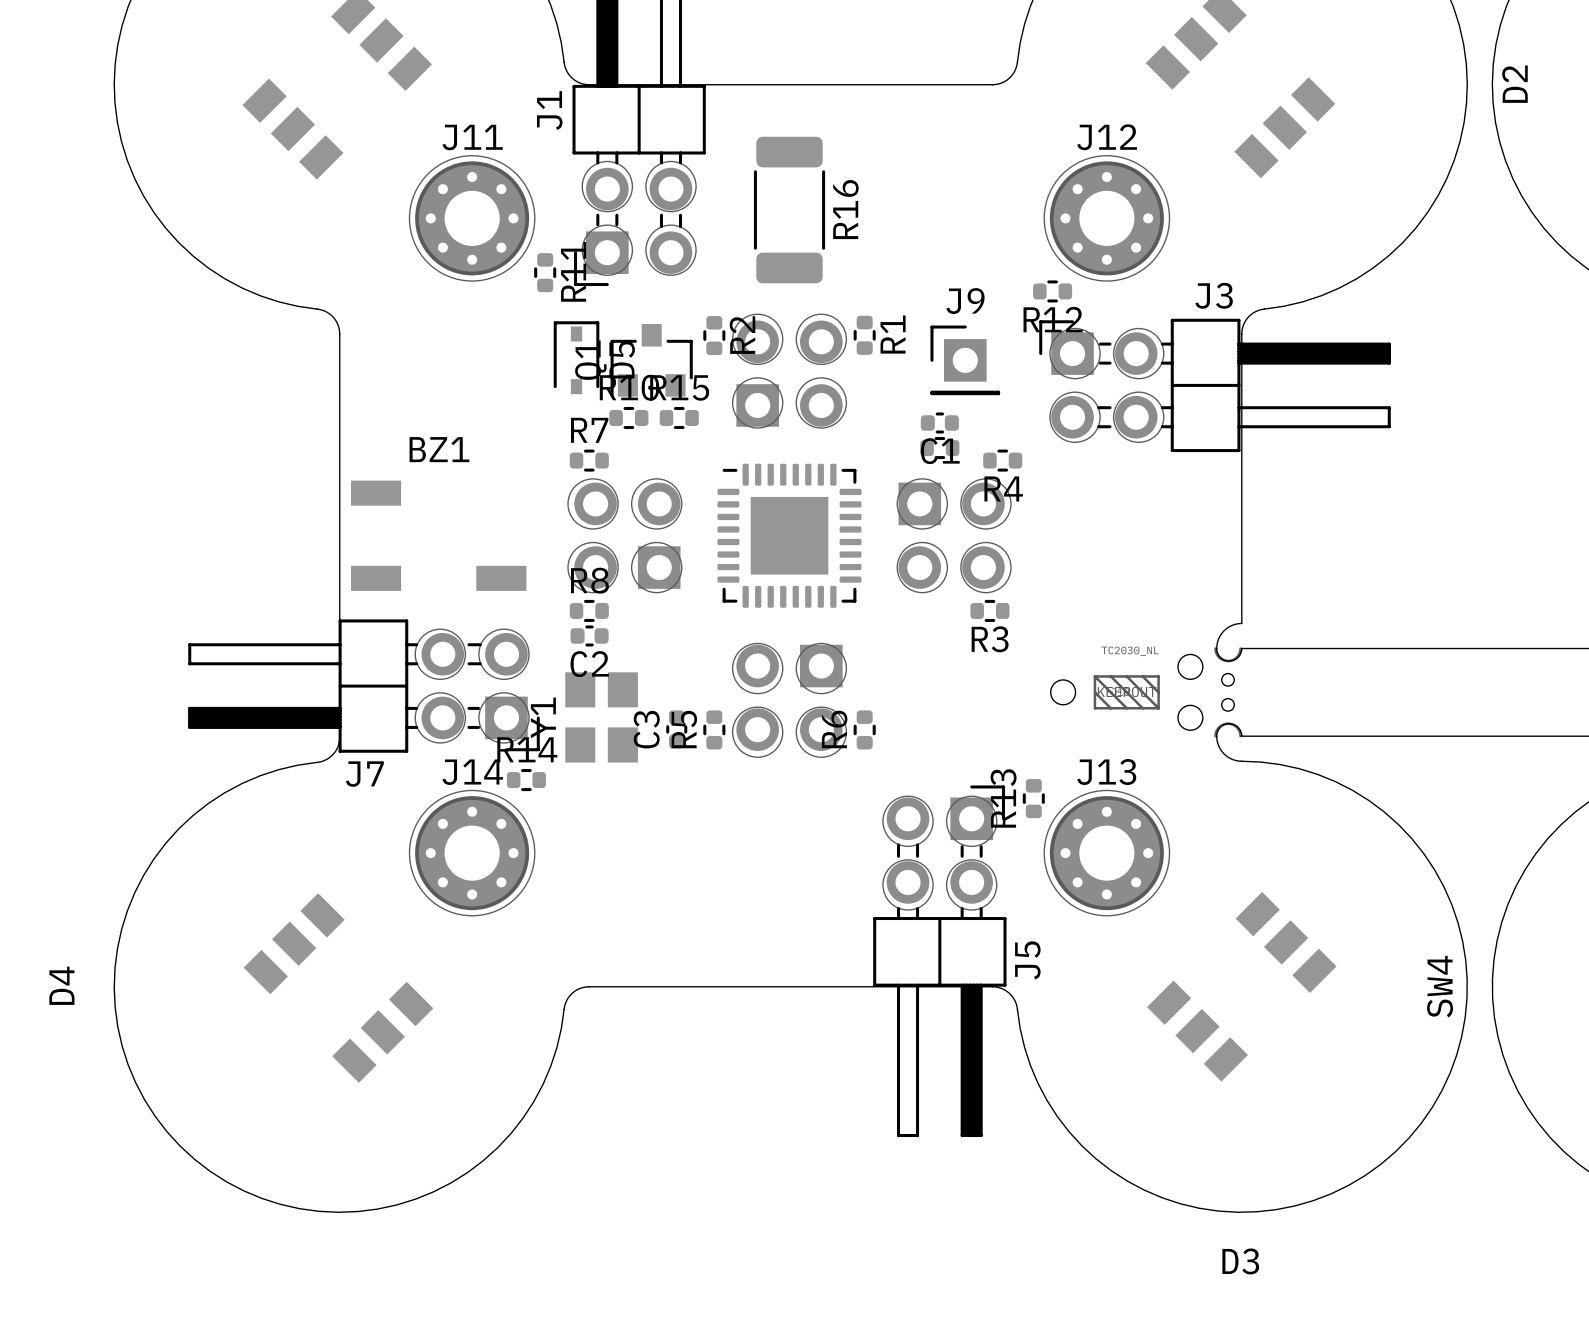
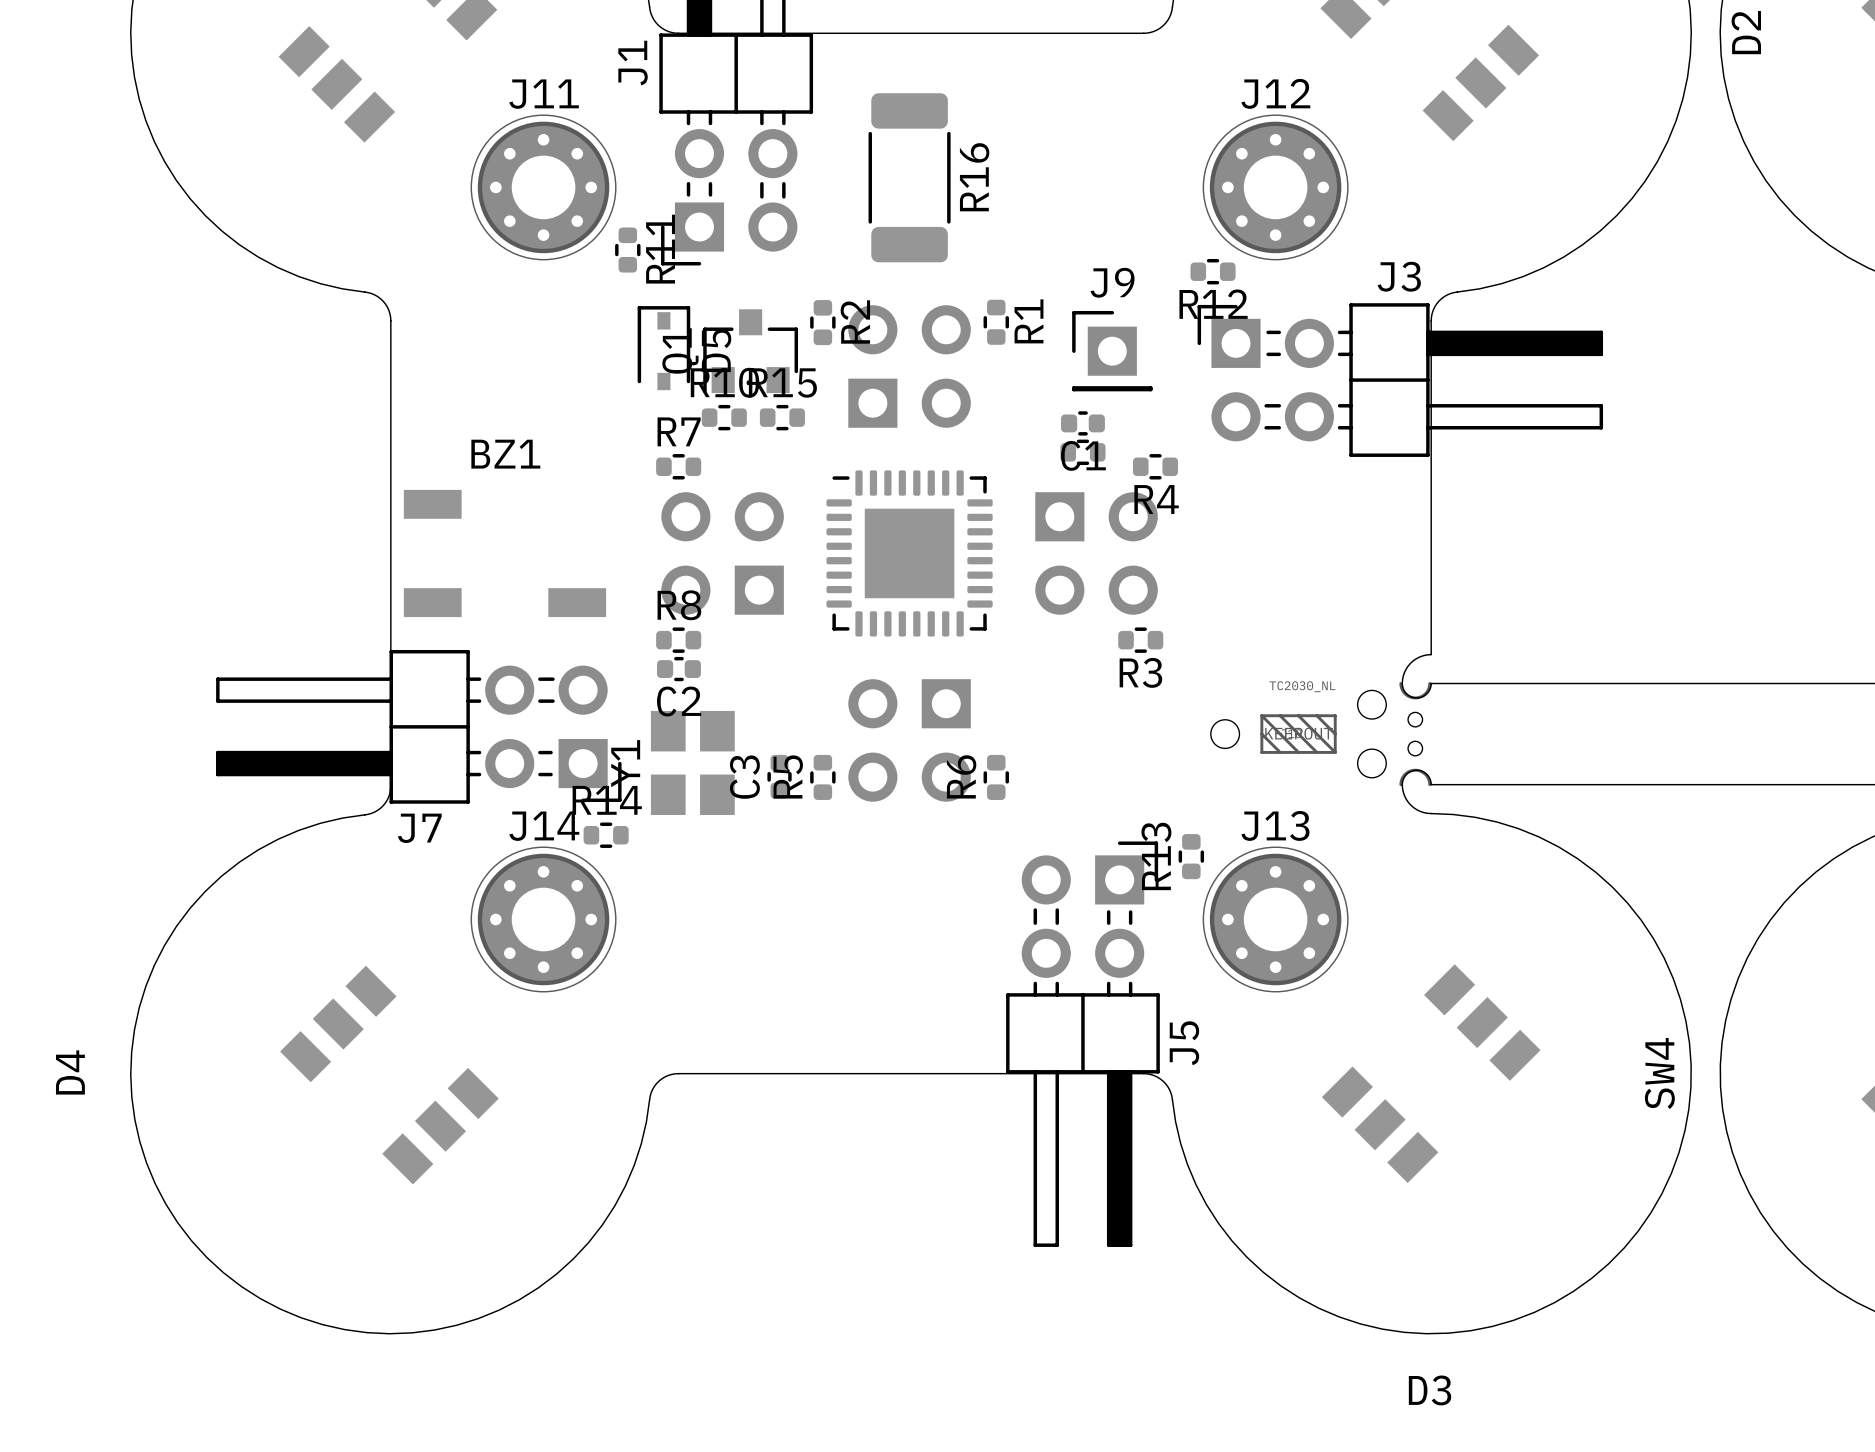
drawing: [581, 160, 697, 276] -> none
drawing: [732, 313, 848, 429] -> none
drawing: [1049, 327, 1165, 443] -> none
drawing: [567, 478, 683, 594] -> none
drawing: [896, 478, 1012, 594] -> none
drawing: [414, 628, 530, 744] -> none
drawing: [732, 642, 848, 758] -> none
drawing: [882, 795, 998, 911] -> none

